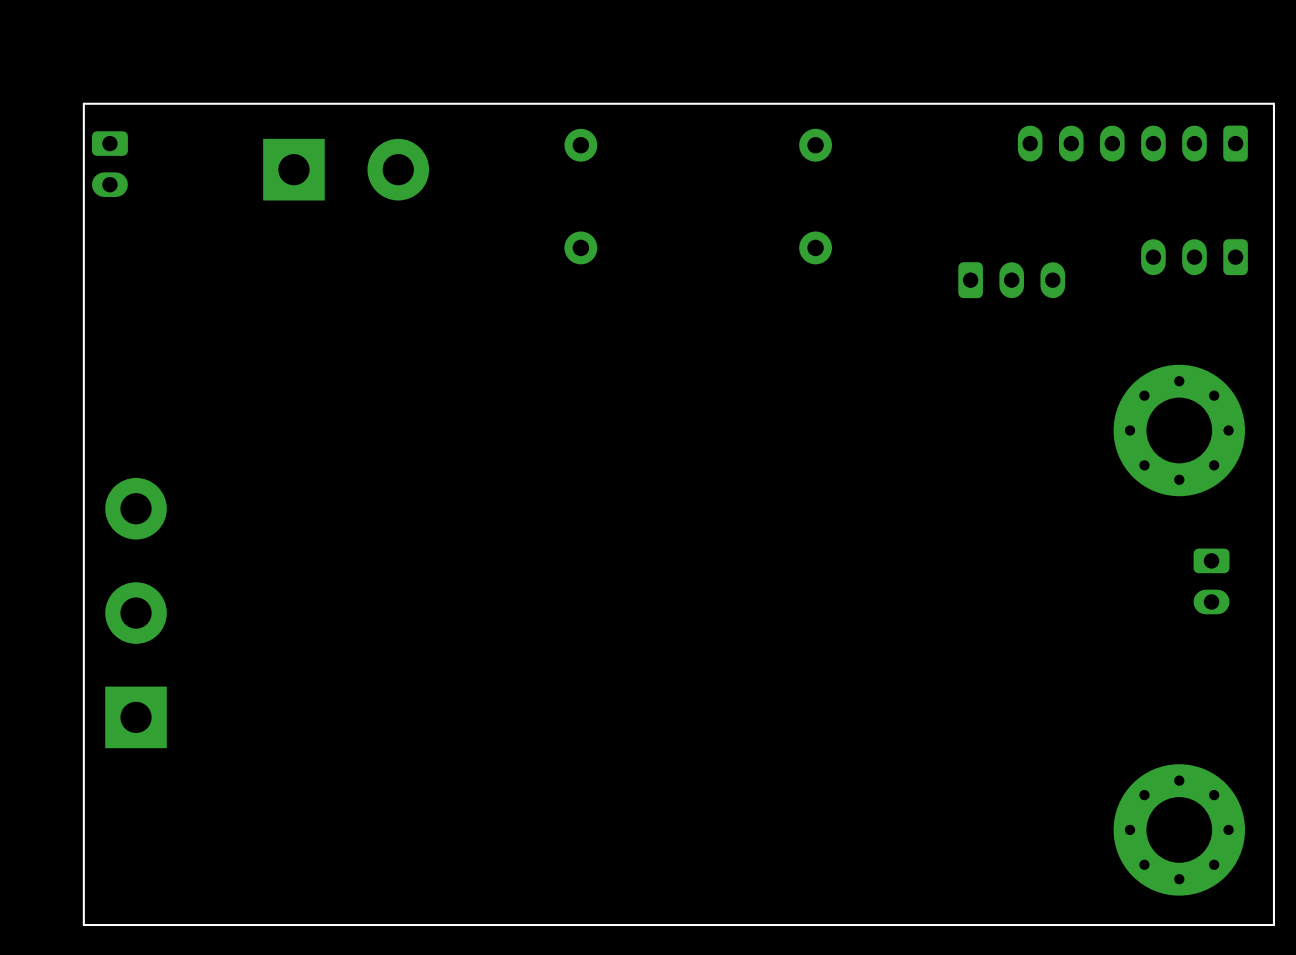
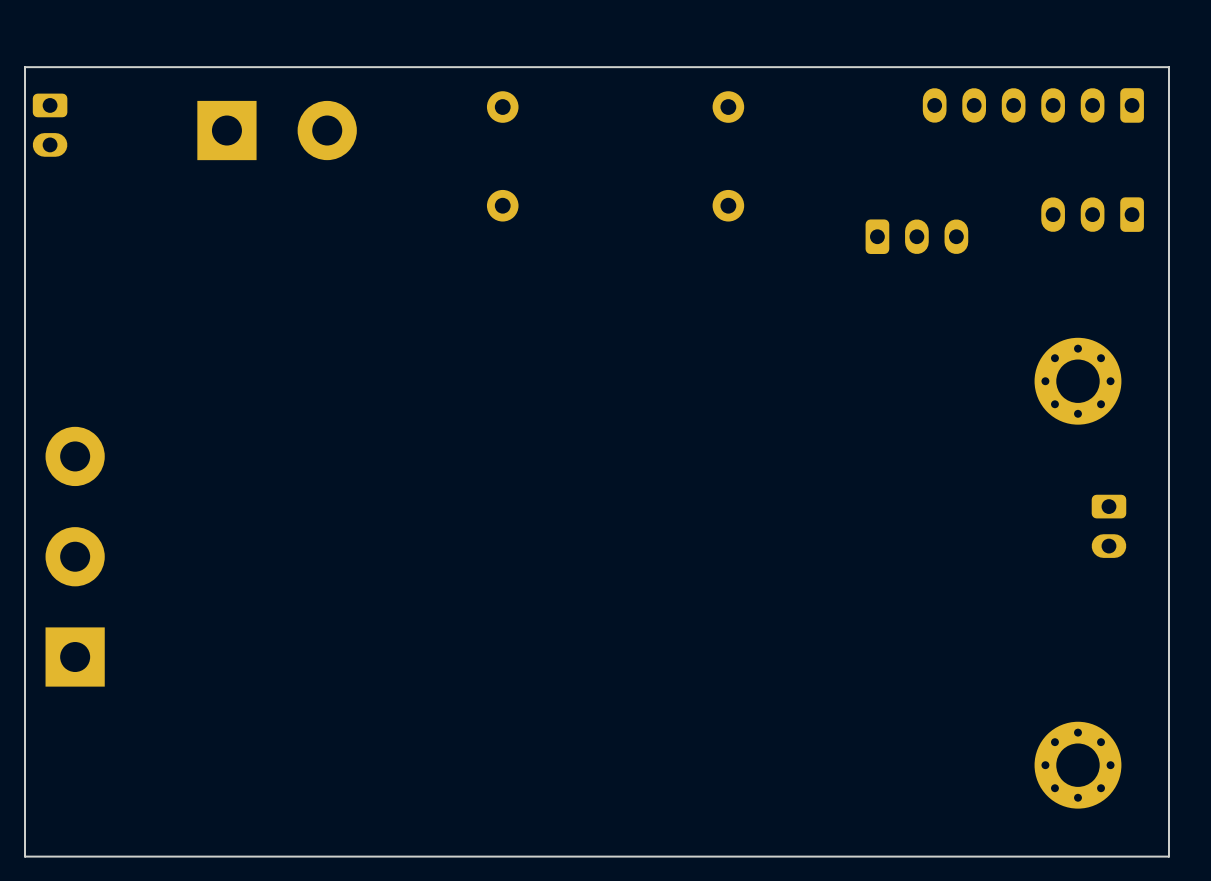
part footprint: [1113, 364, 1246, 497] -> [1034, 337, 1122, 425]
part footprint: [1113, 764, 1246, 896] -> [1034, 721, 1122, 809]

